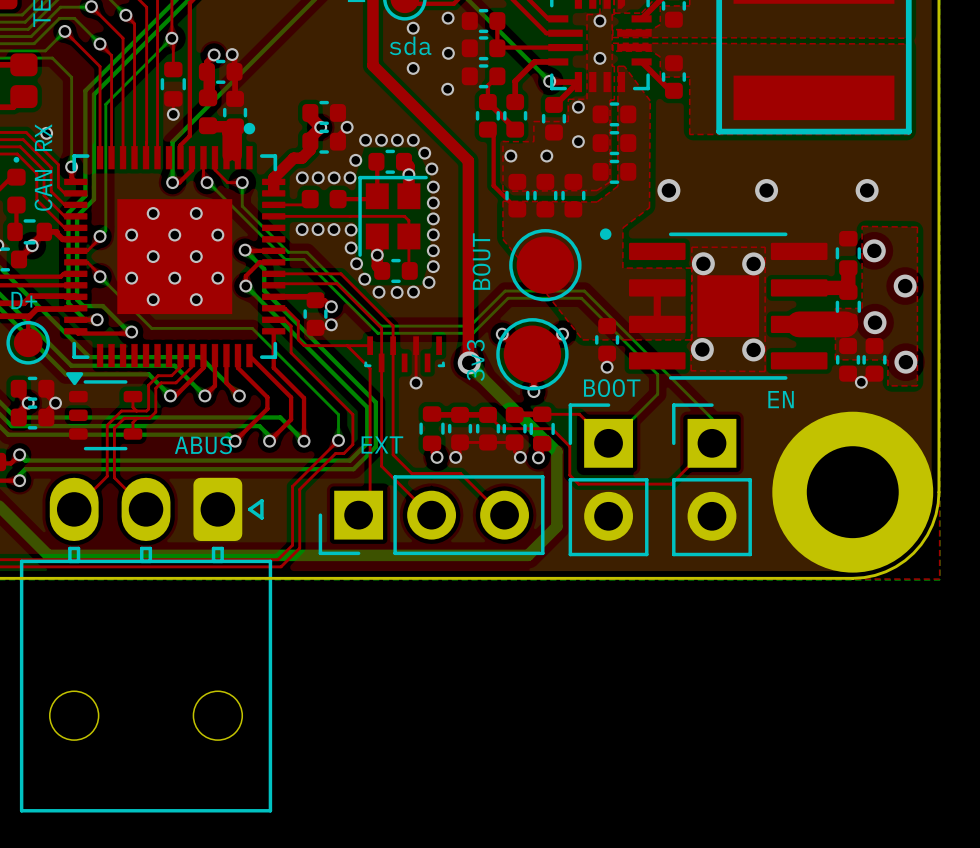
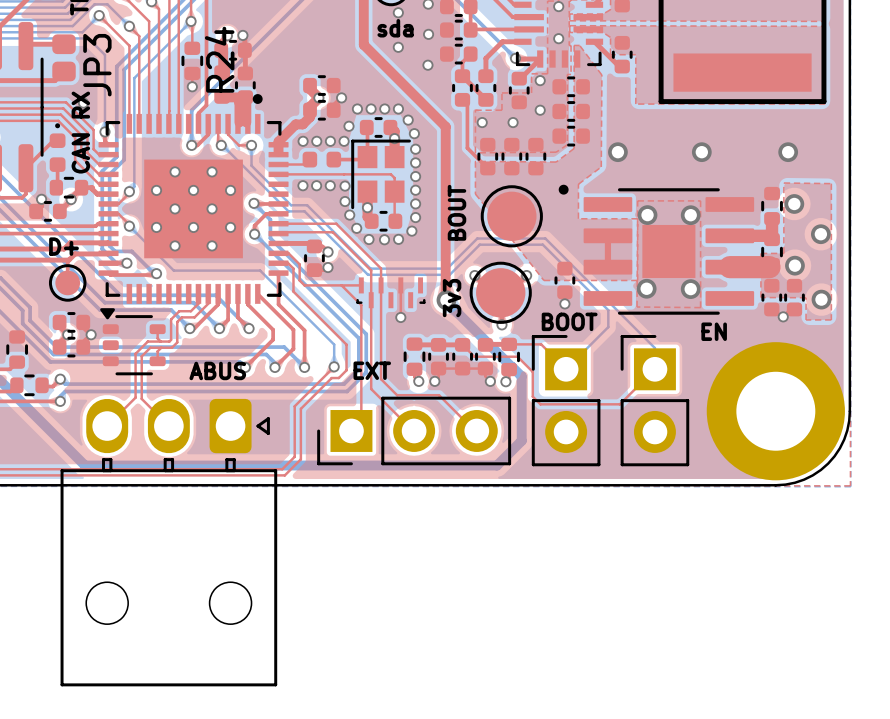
R24 name: none -> R24 (219, 59)
JP3 name: none -> JP3 (97, 65)

